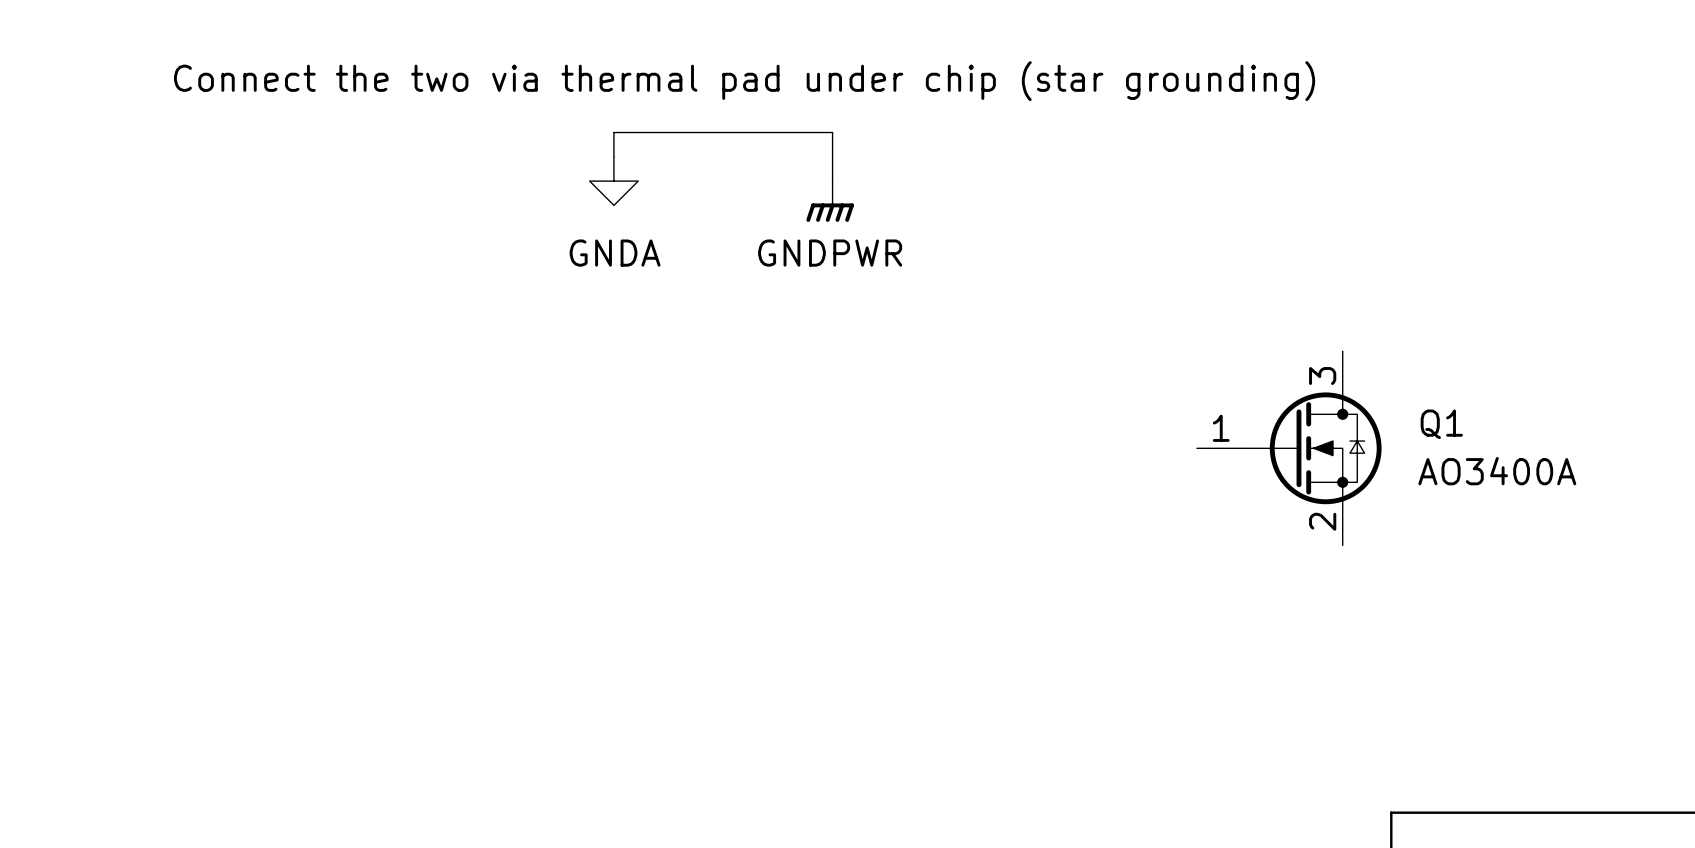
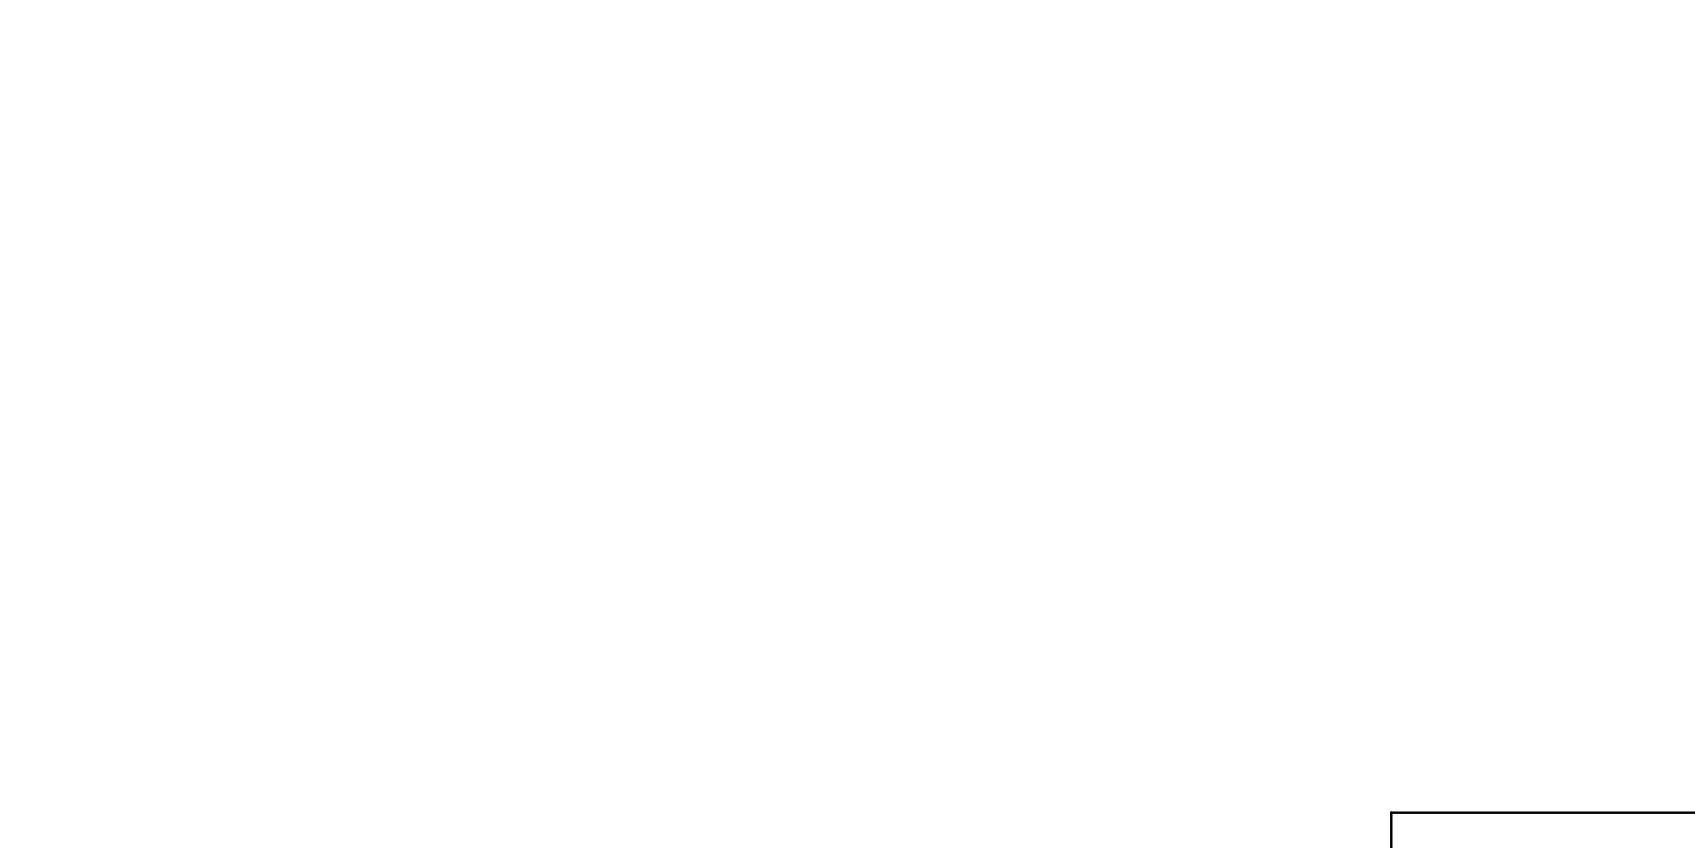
text: Connect the two via thermal pad under chip (star grounding) (744, 81) -> none
wire: (613, 156) (613, 132) (832, 132) (832, 181) -> none
power symbol: GNDA (613, 181) -> none
power symbol: GNDPWR (830, 201) -> none
Q1: AO3400A (1289, 448) -> none

